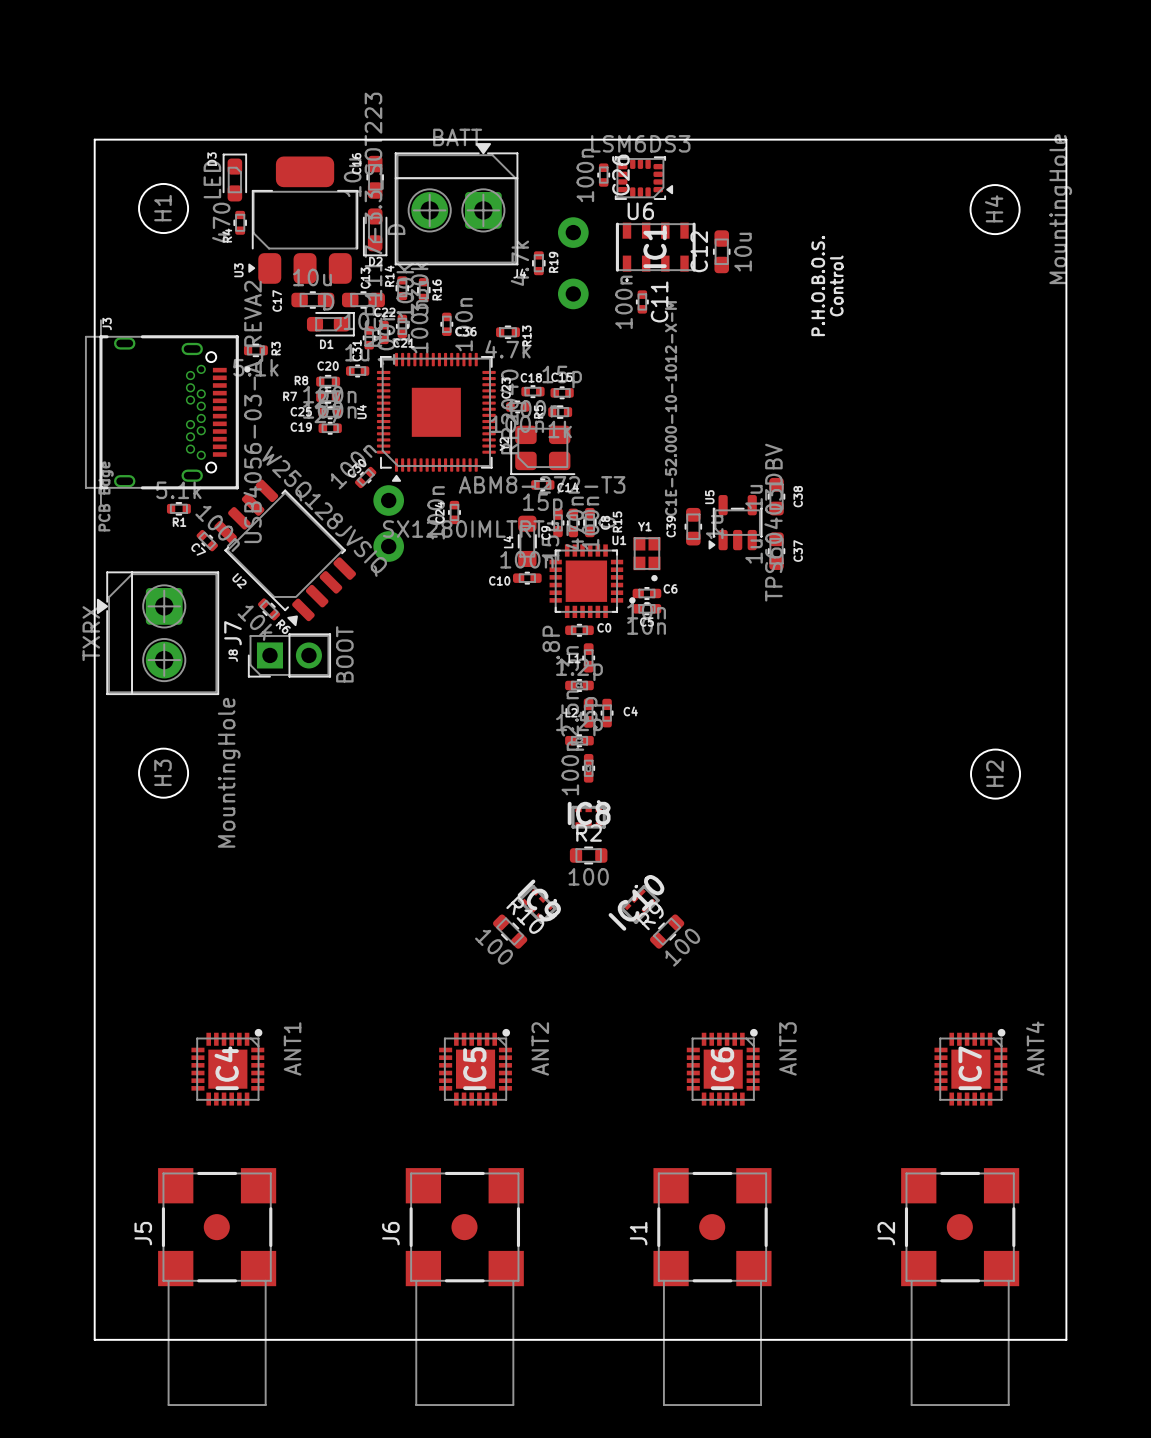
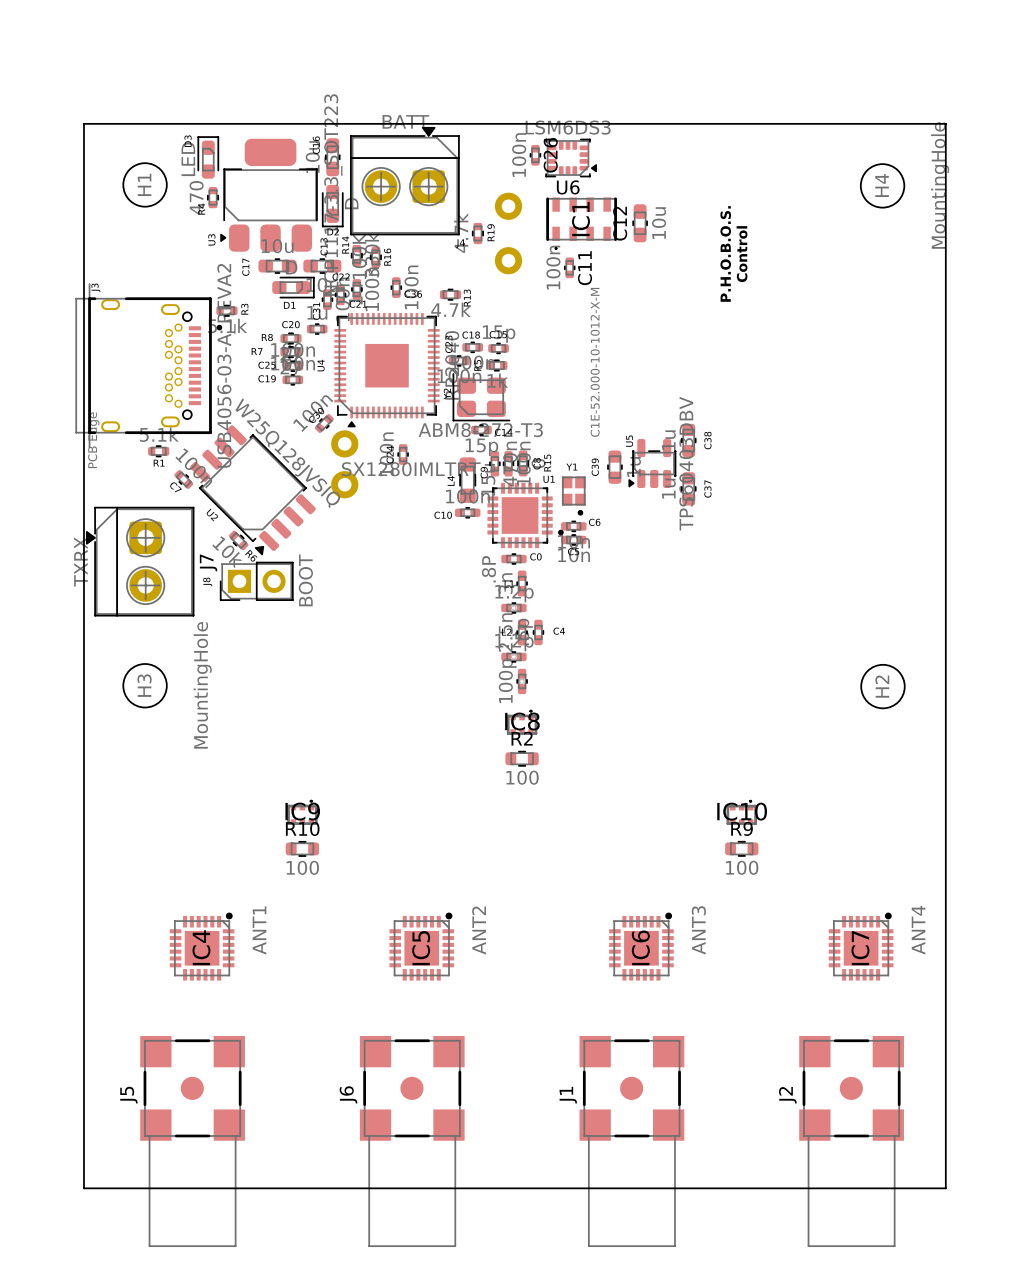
IC9 rotation: 0° (537, 904) -> 45° counterclockwise (302, 812)
IC9 position: (537, 904) -> (302, 812)
IC10 rotation: 0° (640, 904) -> 45° clockwise (741, 812)
IC10 position: (640, 904) -> (741, 812)
R10 rotation: 0° (510, 931) -> 45° counterclockwise (302, 848)
R10 position: (510, 931) -> (302, 848)
R9 rotation: 0° (667, 931) -> 45° clockwise (741, 848)
R9 position: (667, 931) -> (741, 848)

